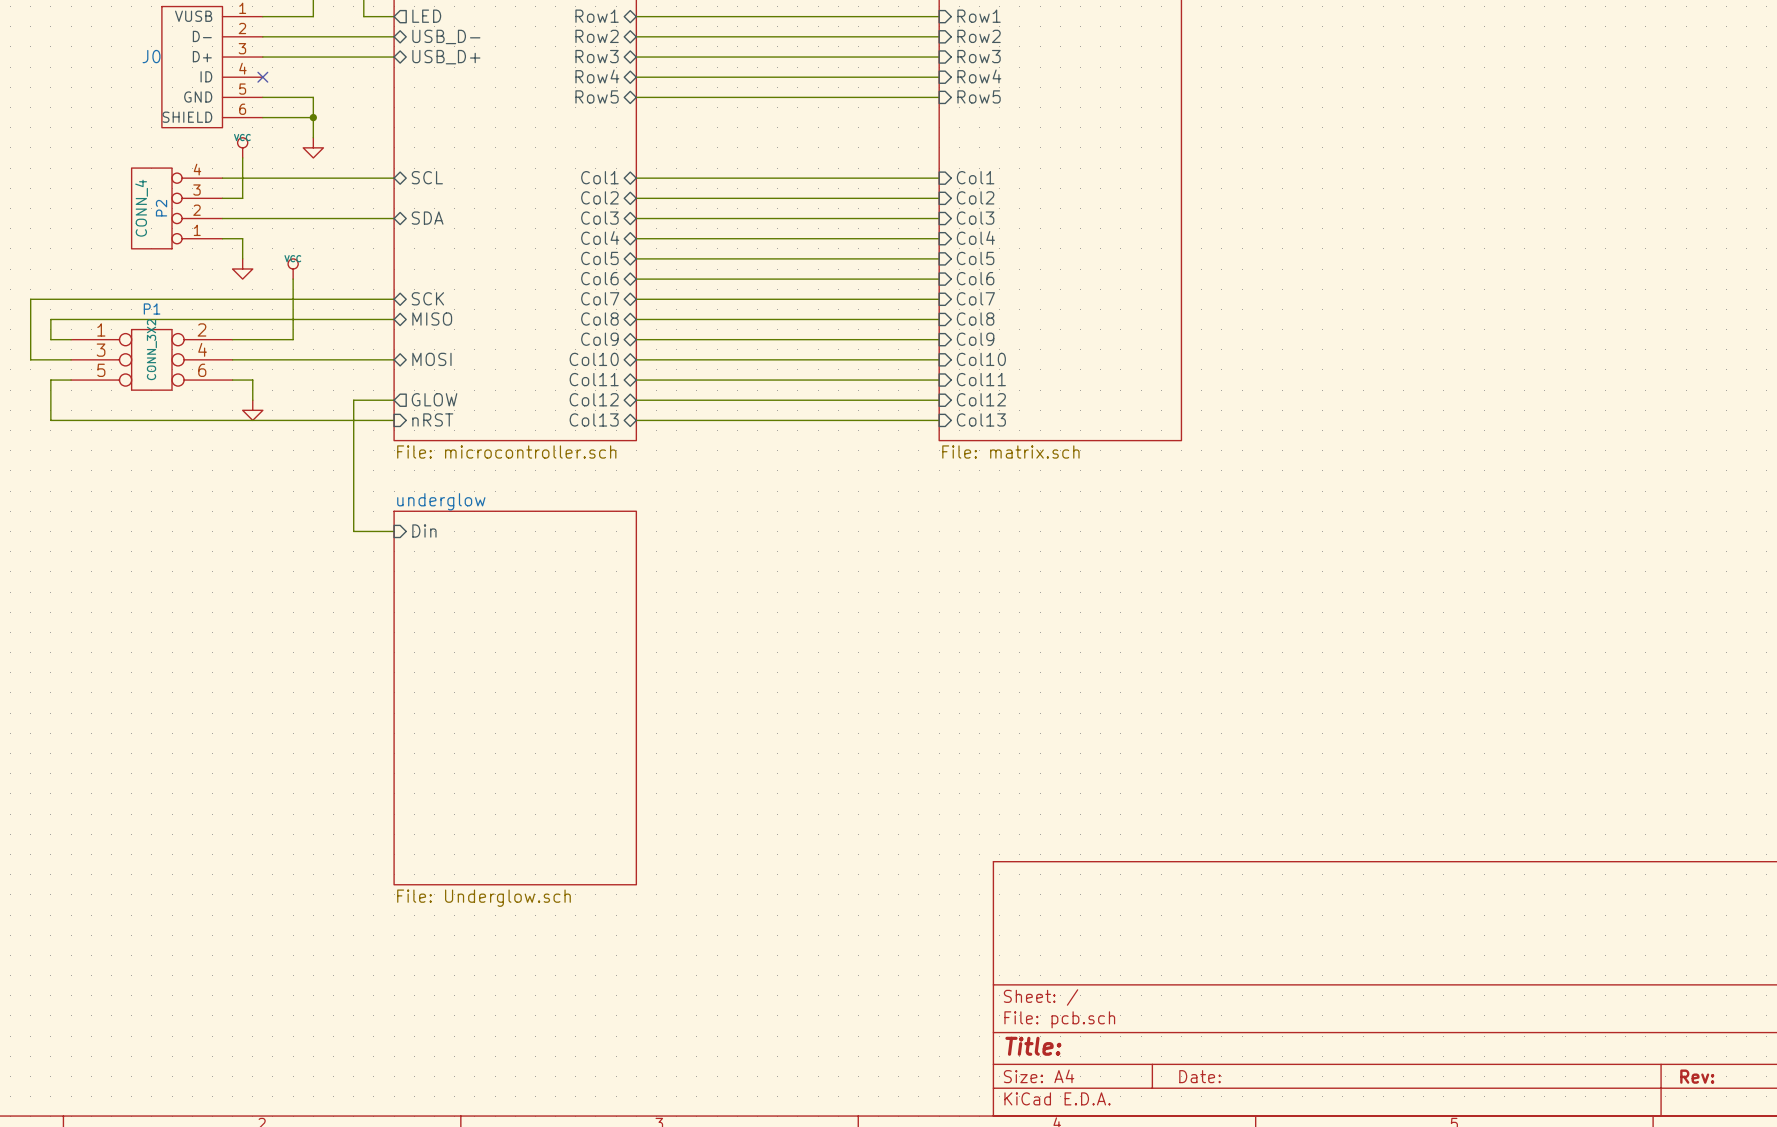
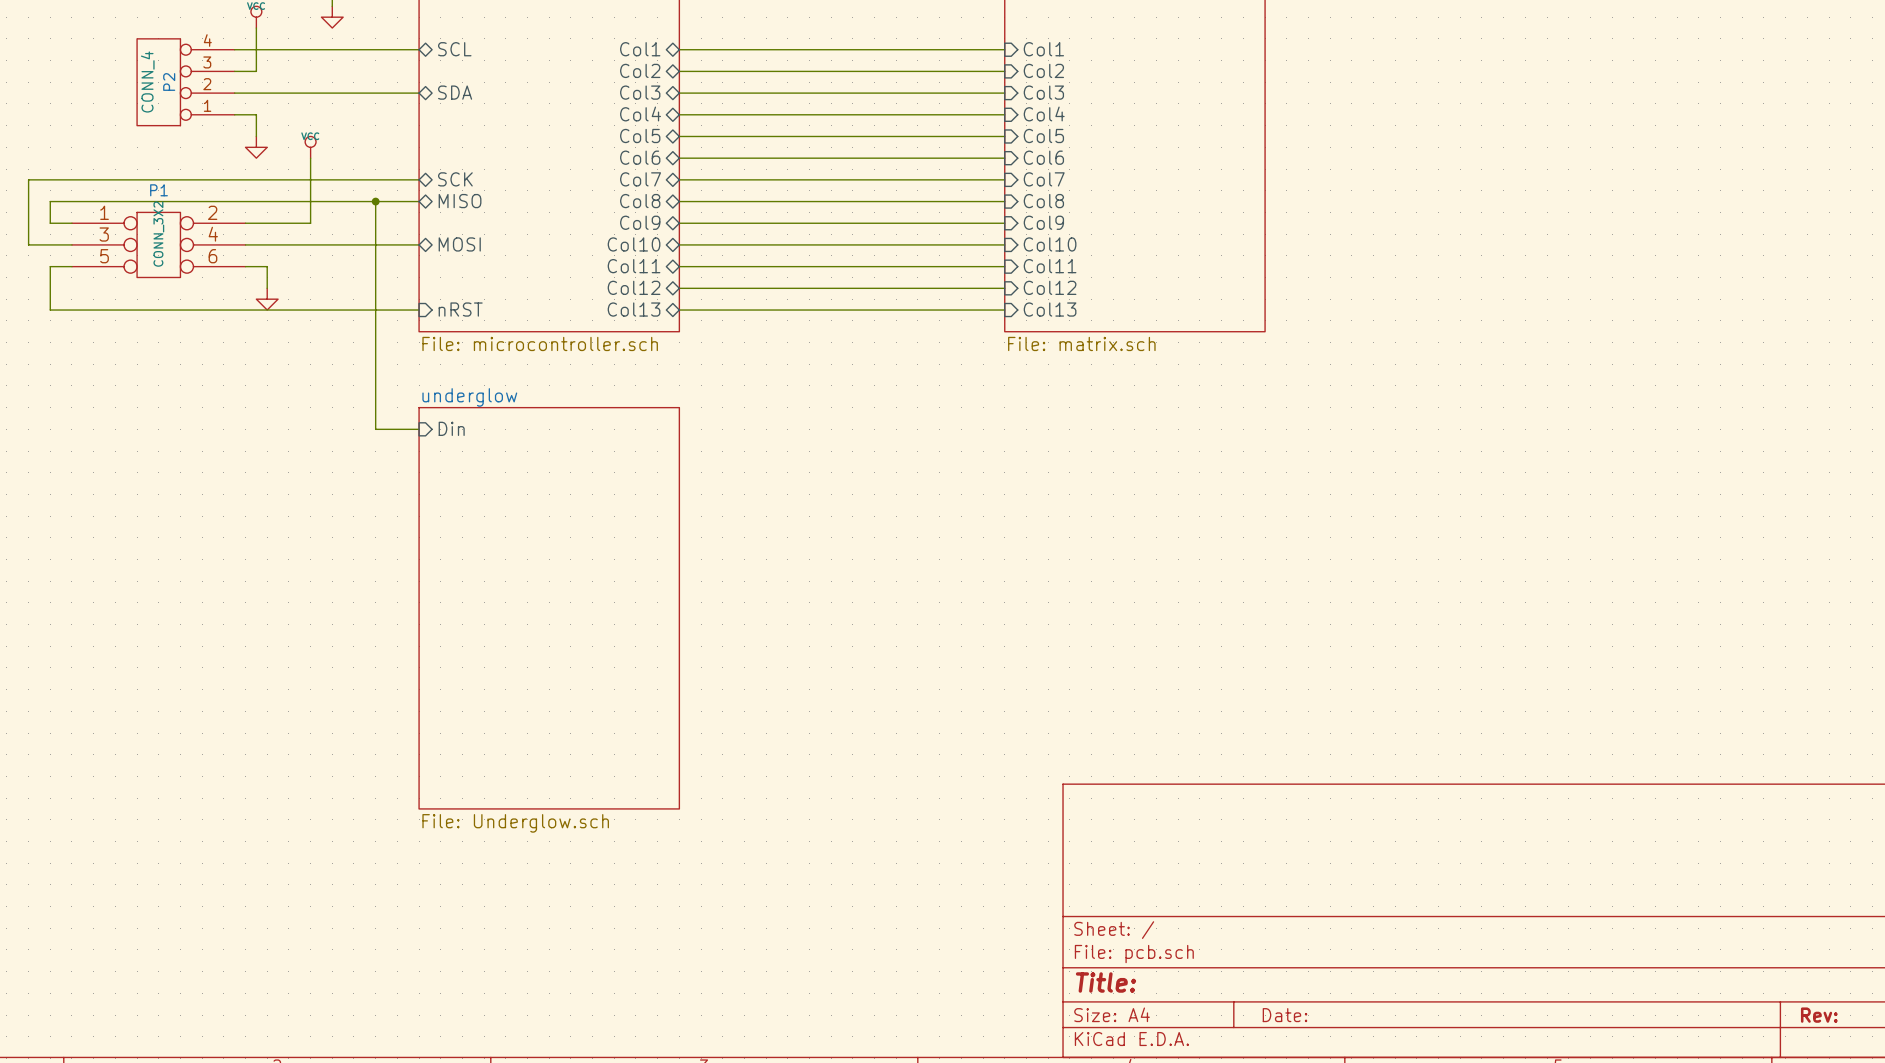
junction: none -> (375, 201)
sheet pin: GLOW (434, 399) -> none
wire: (353, 400) (394, 400) -> (375, 288) (375, 201)

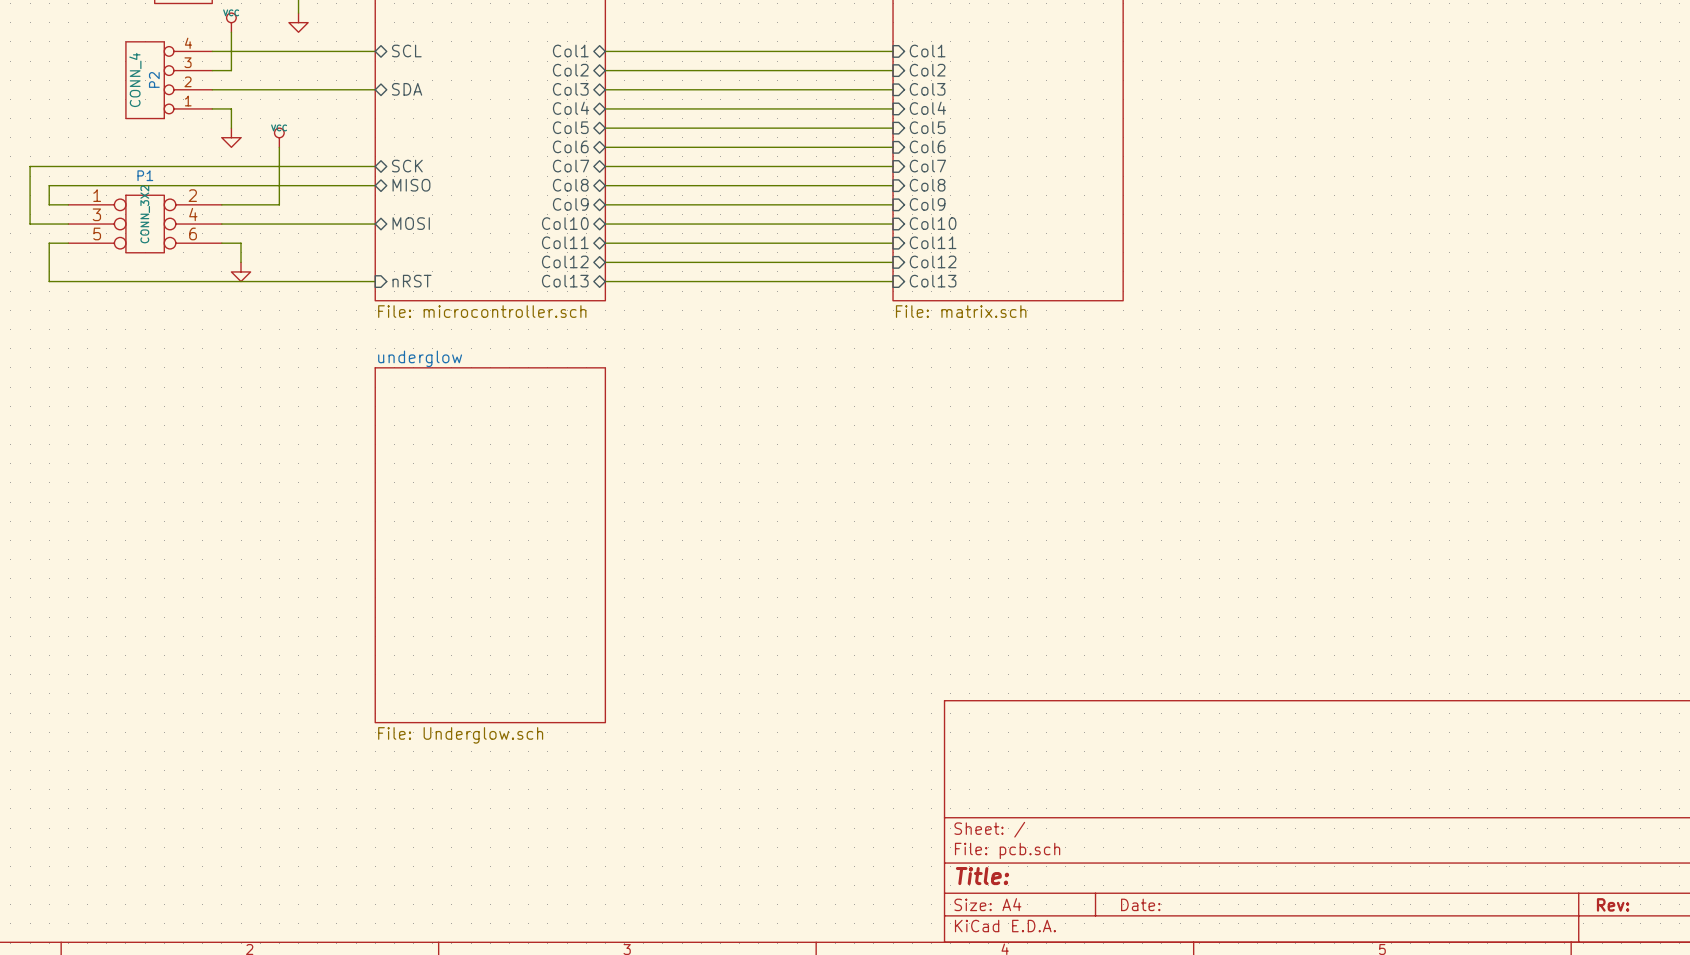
wire: (375, 201) (375, 429) (419, 429) -> none
junction: (375, 201) -> none
sheet pin: Din (451, 428) -> none

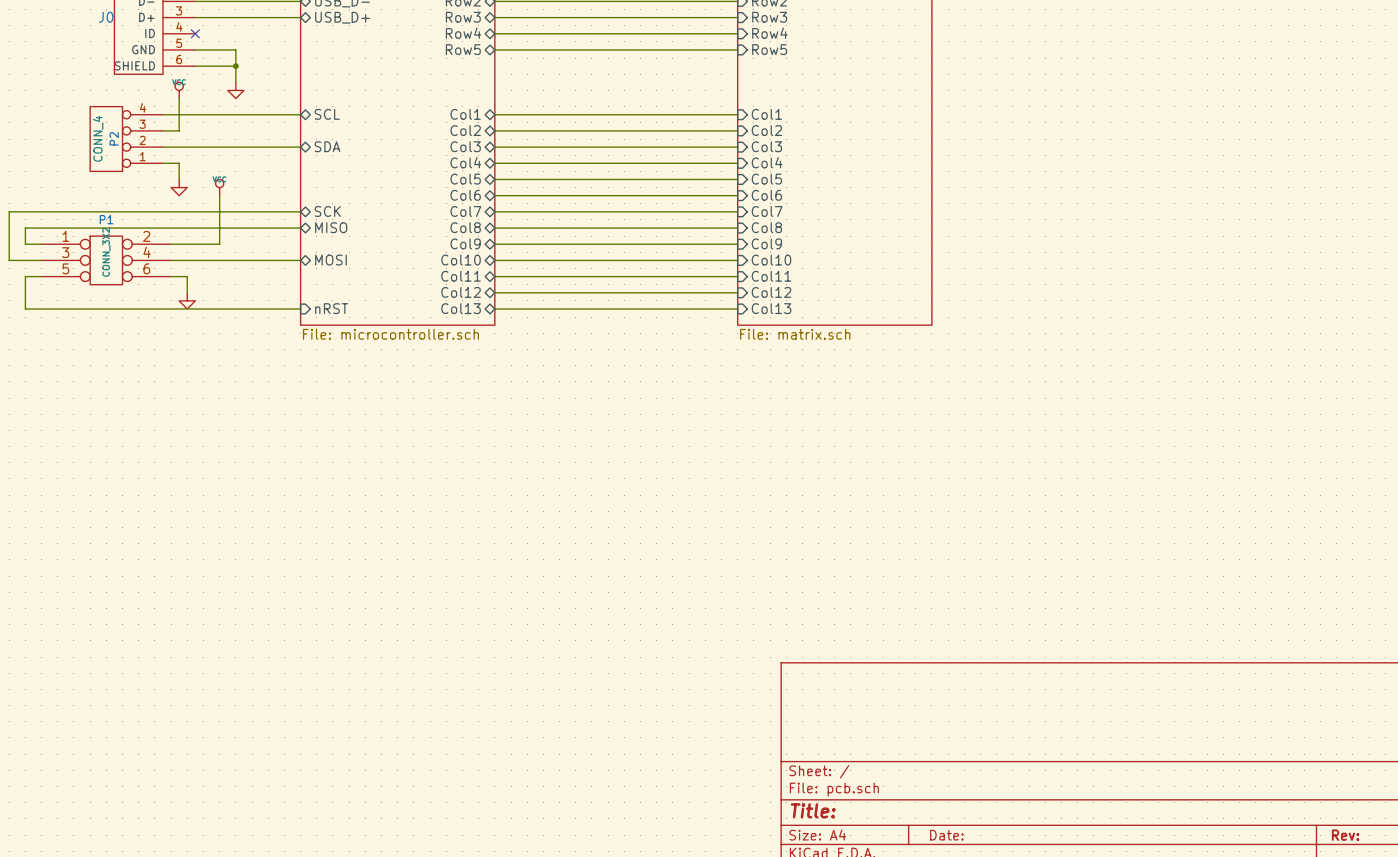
sheet underglow: File: Underglow.sch (490, 545) -> none

